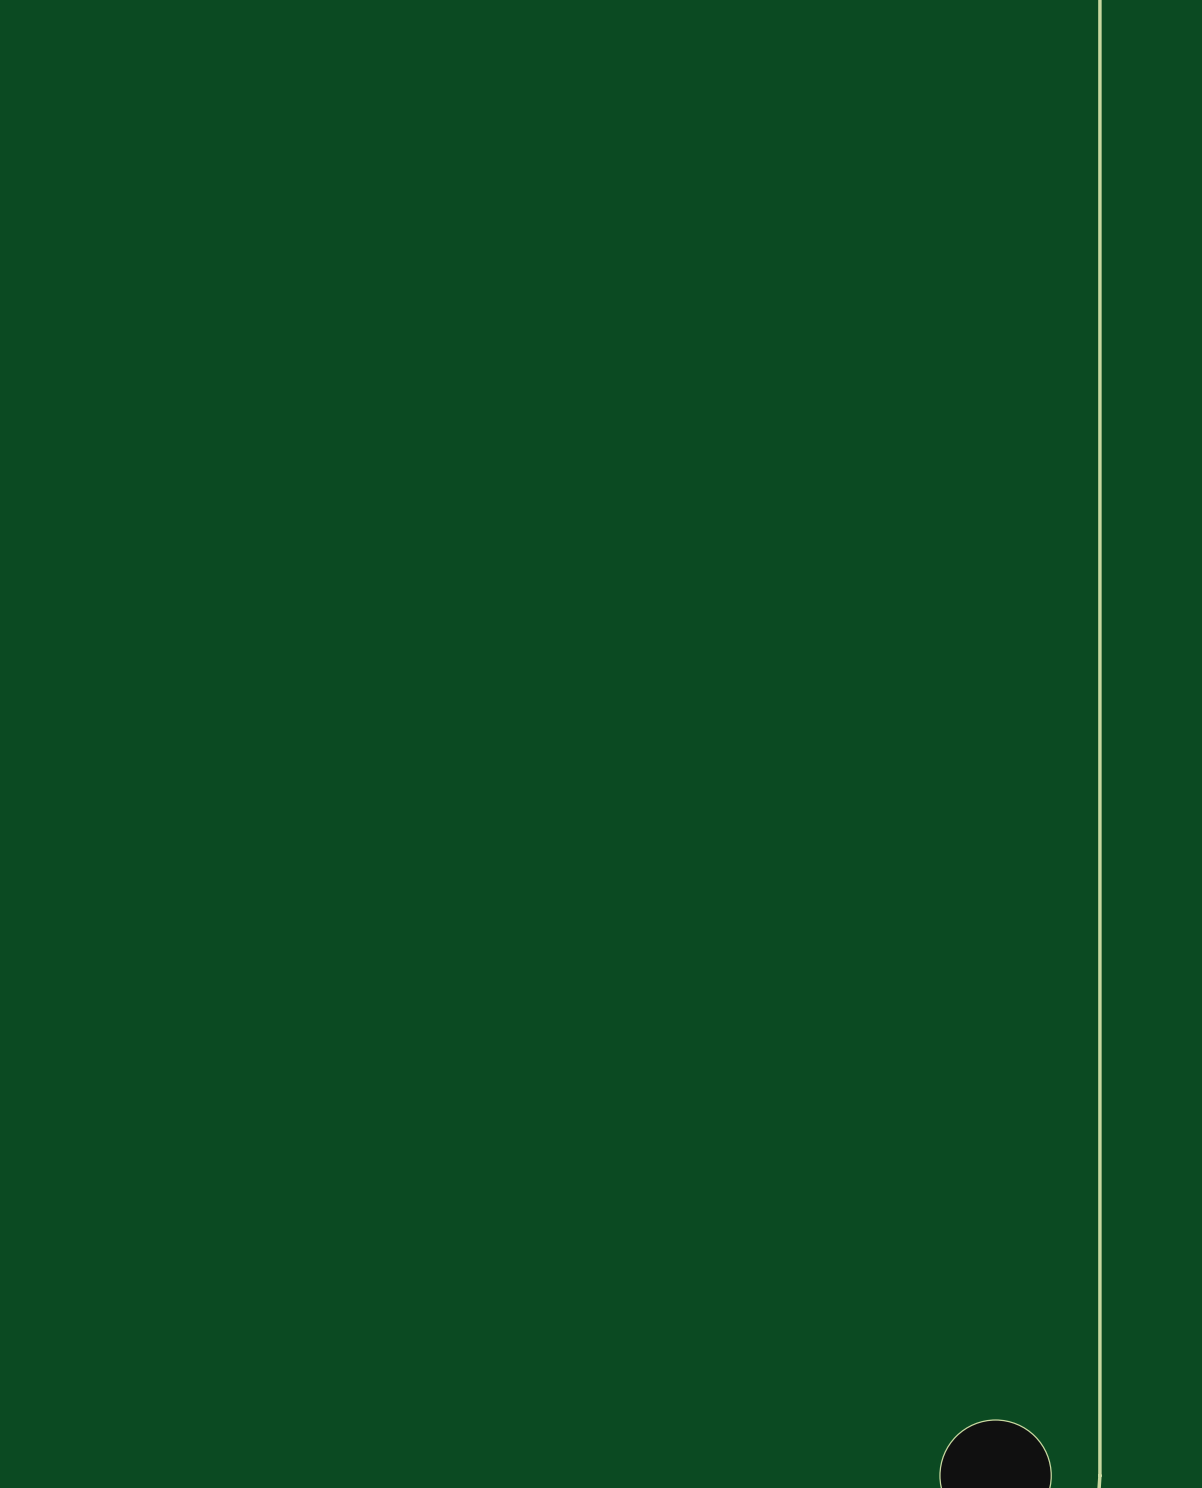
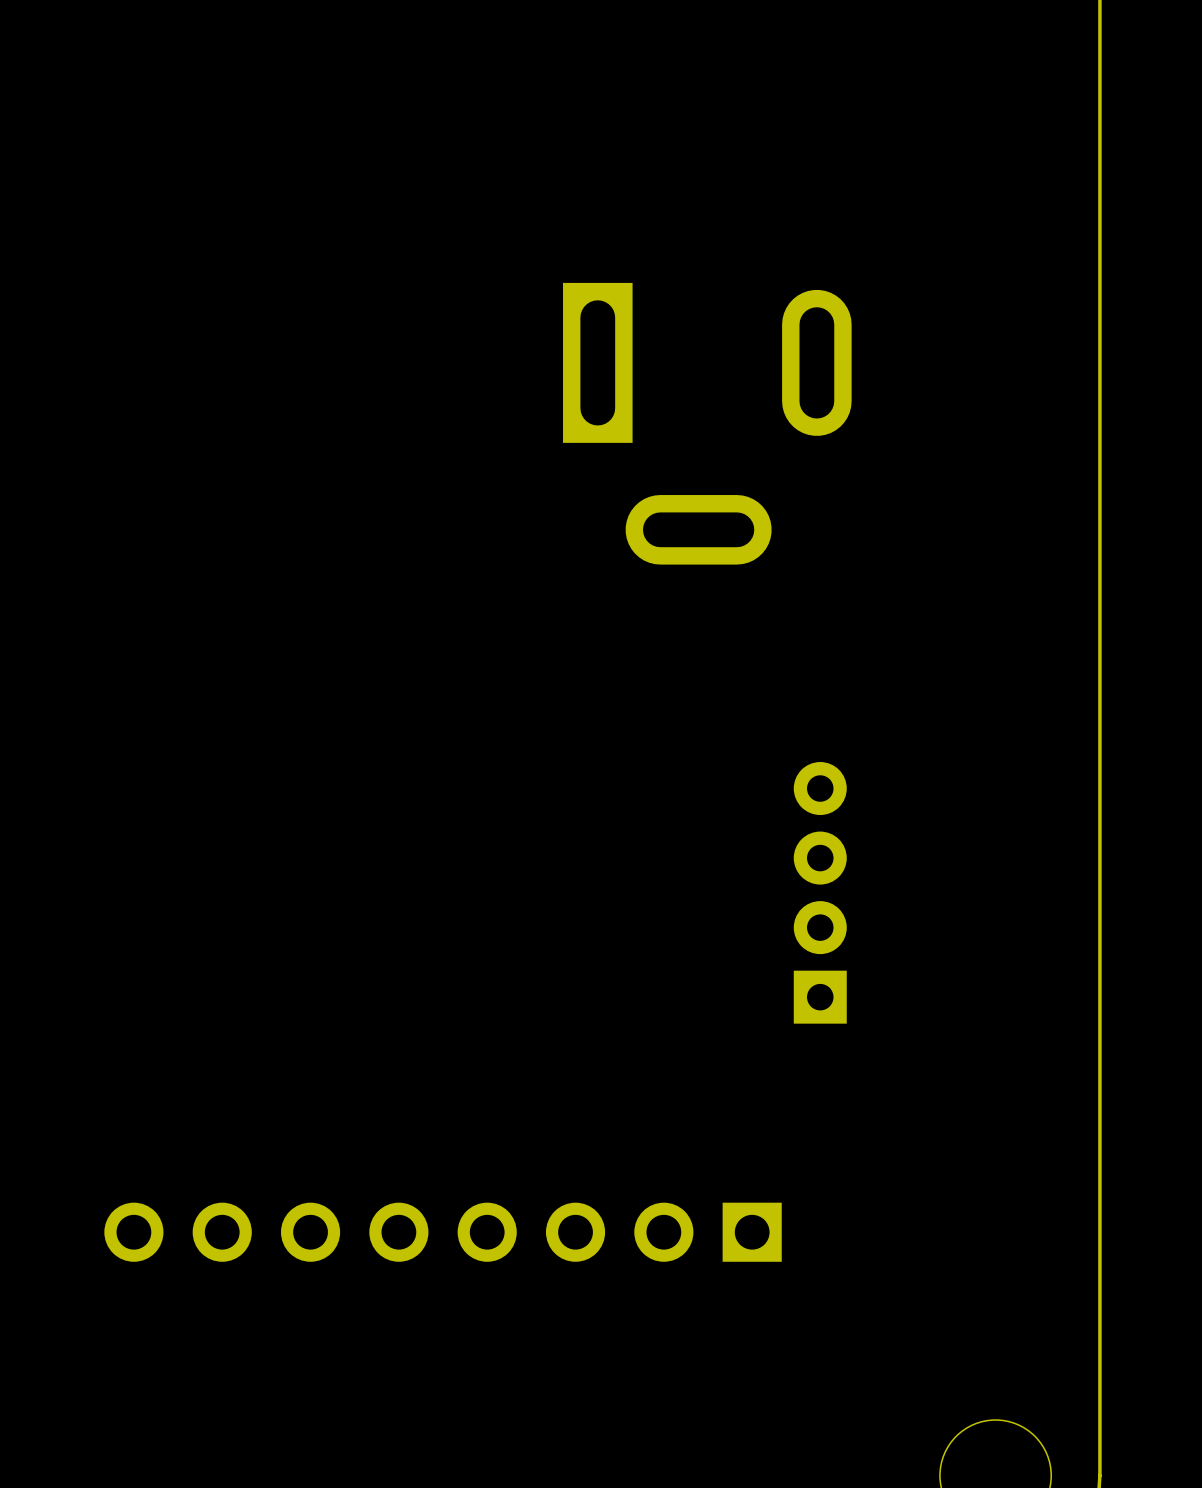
part: none -> (707, 423)
part: none -> (820, 892)
part: none -> (443, 1232)

